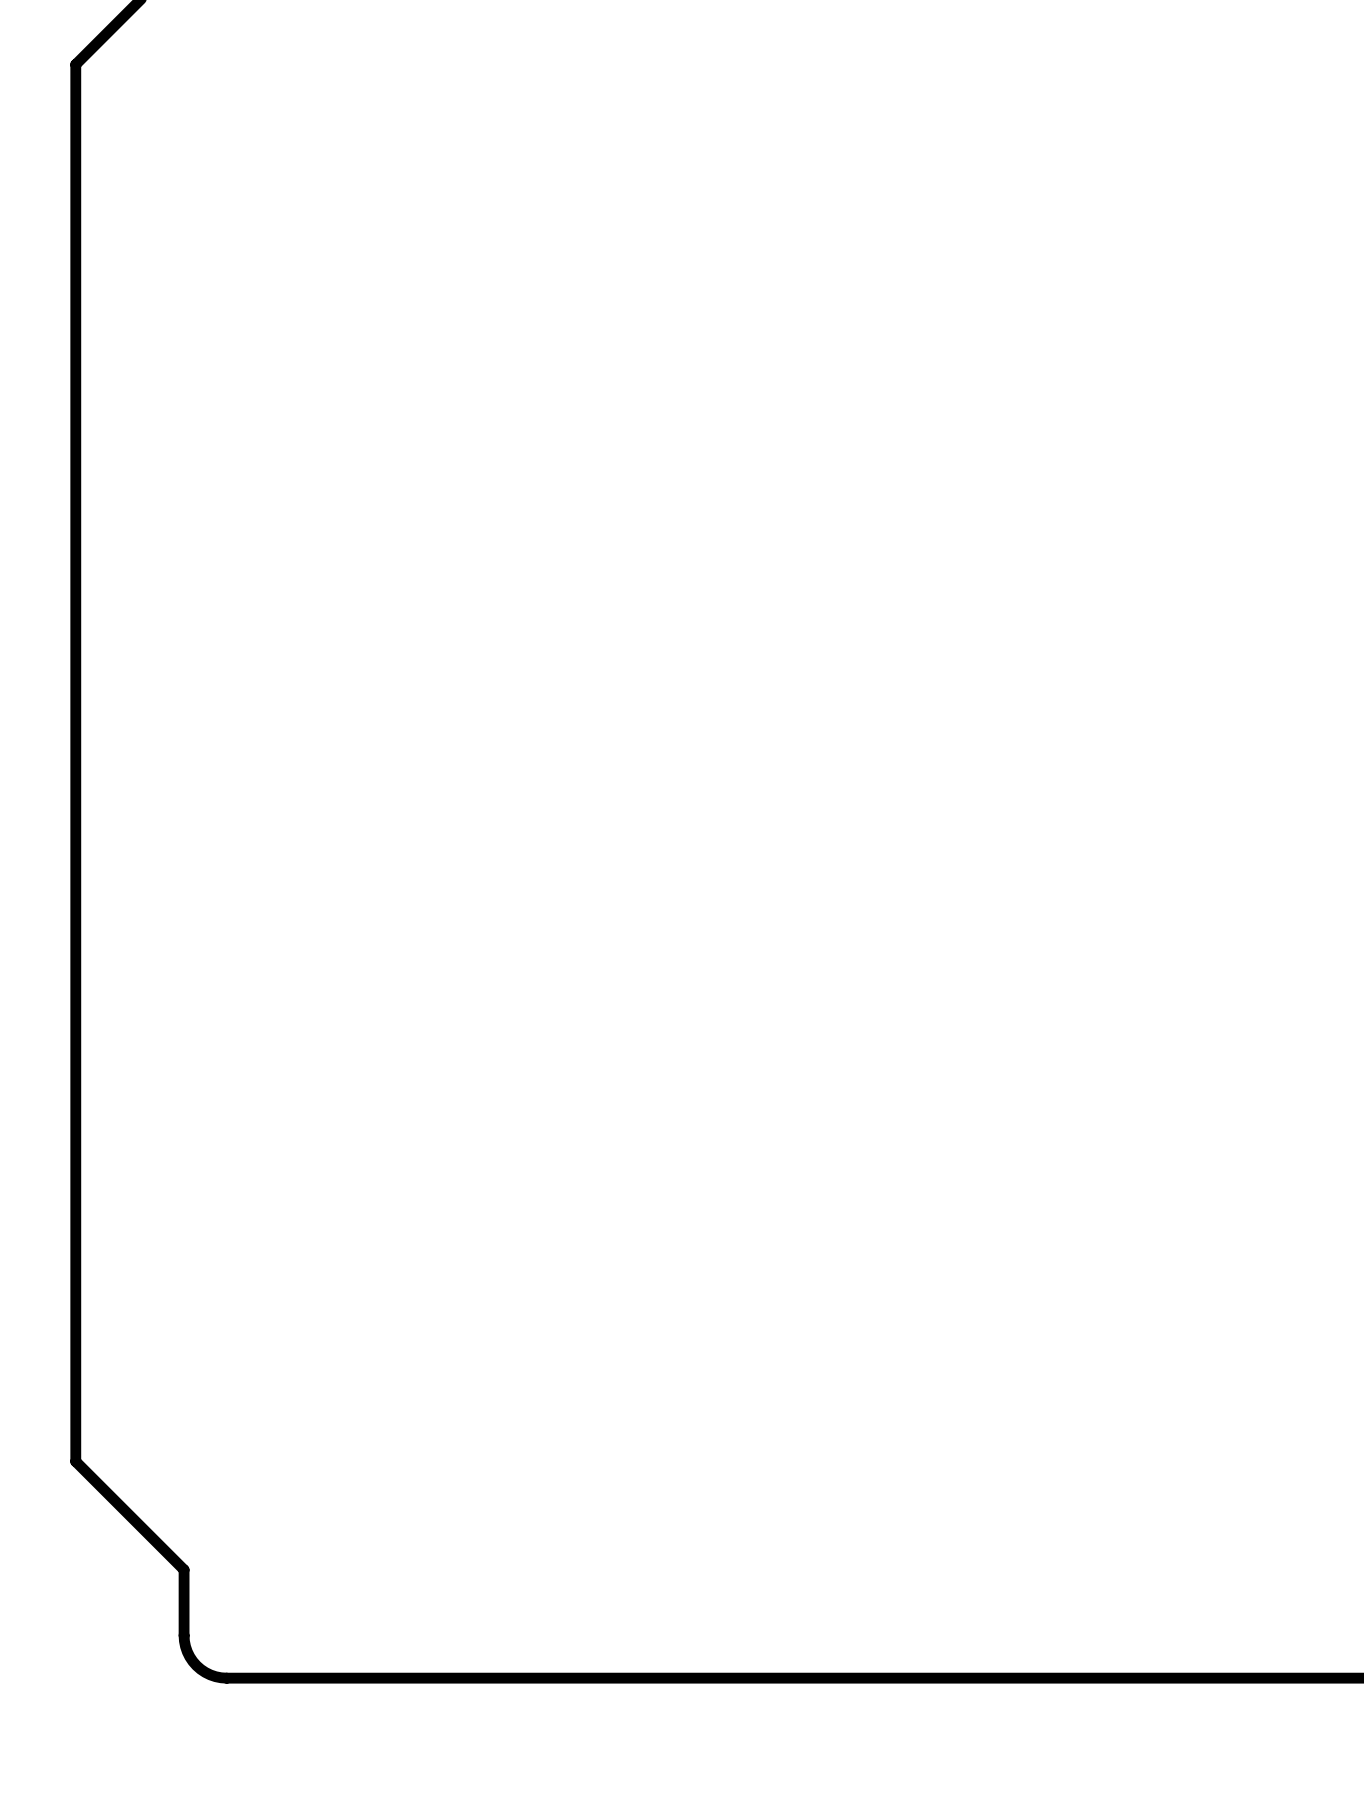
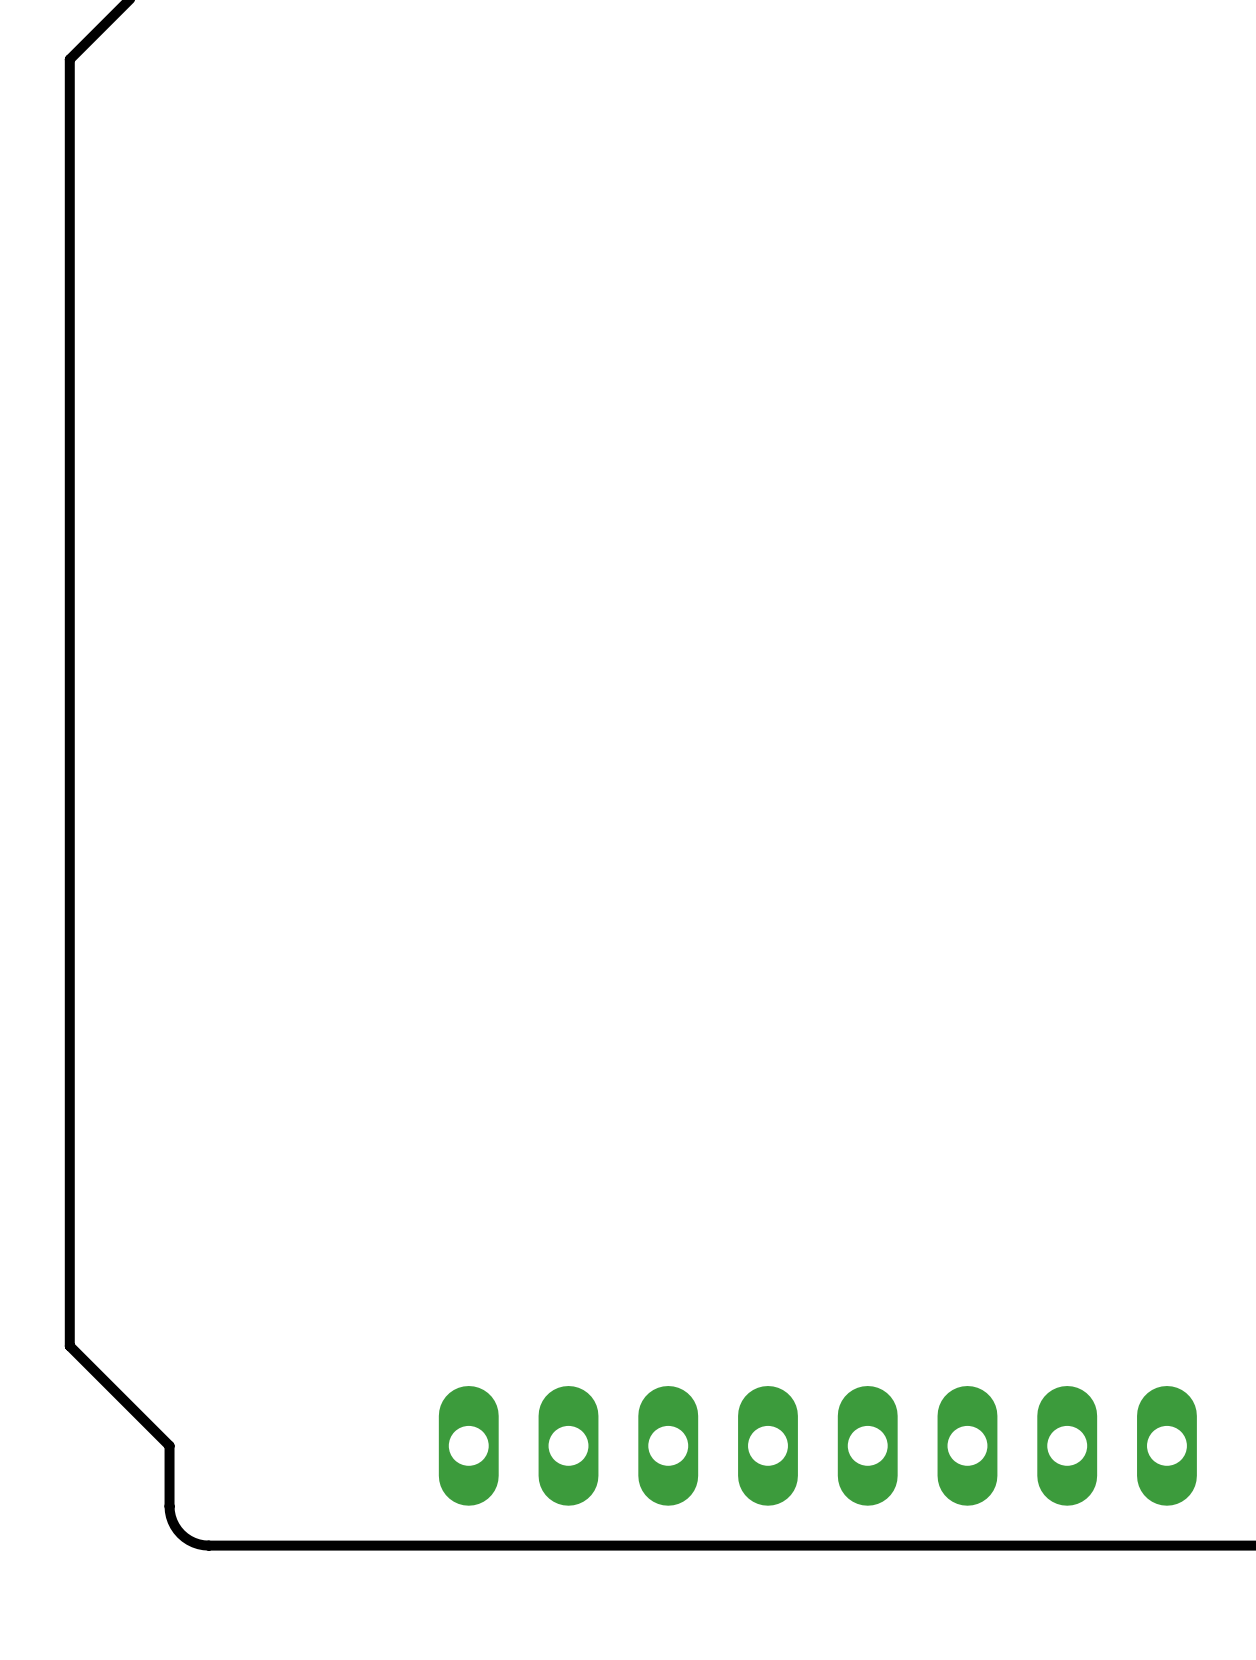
part: none -> (817, 1445)

